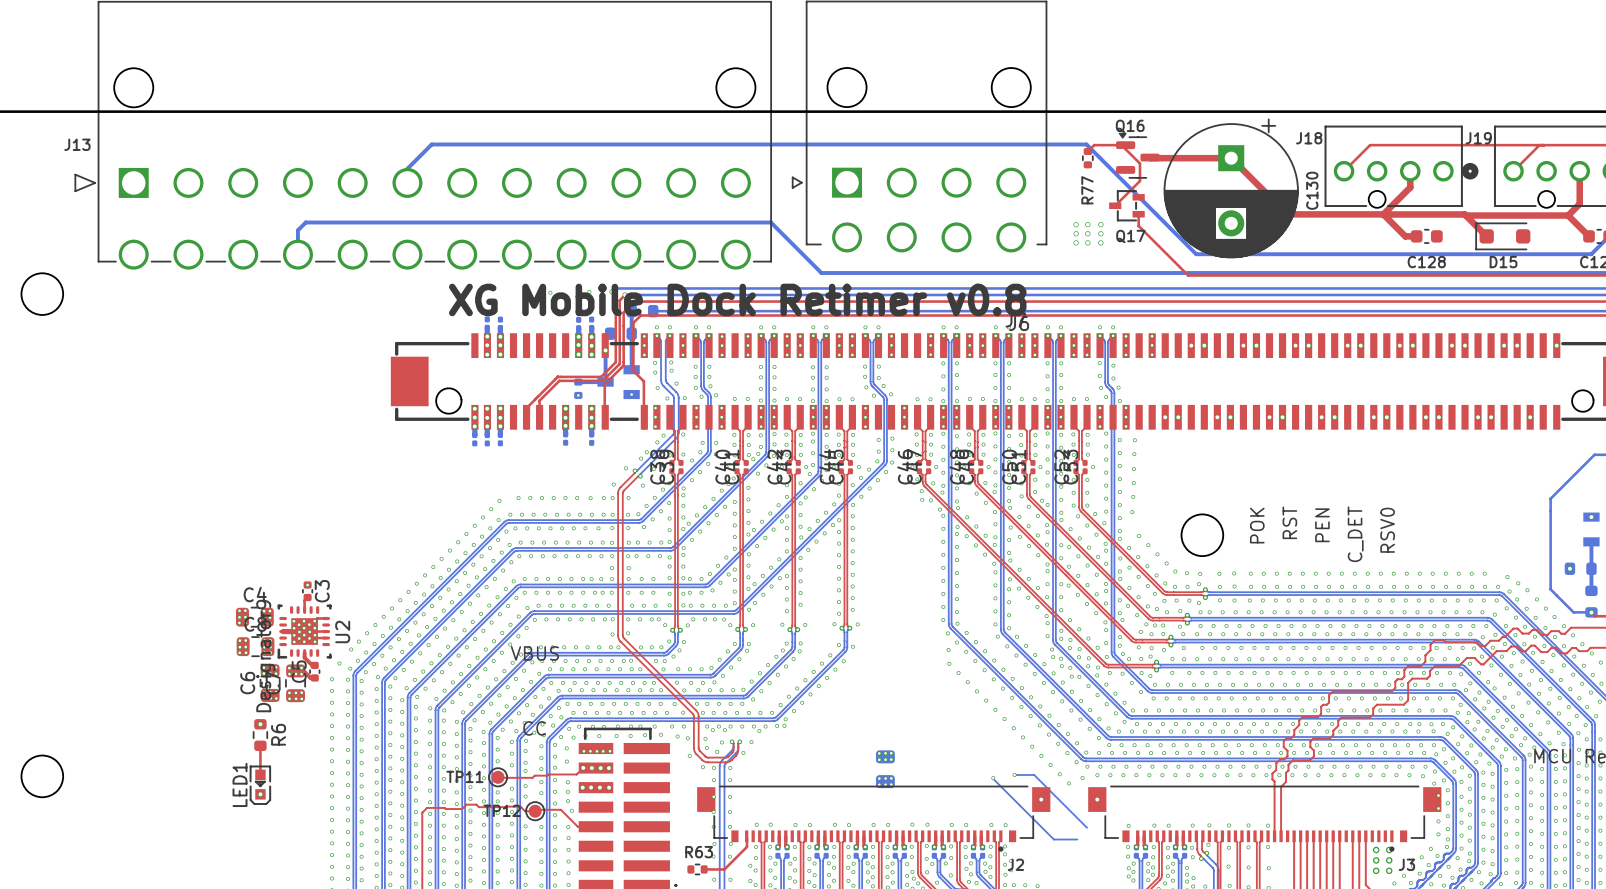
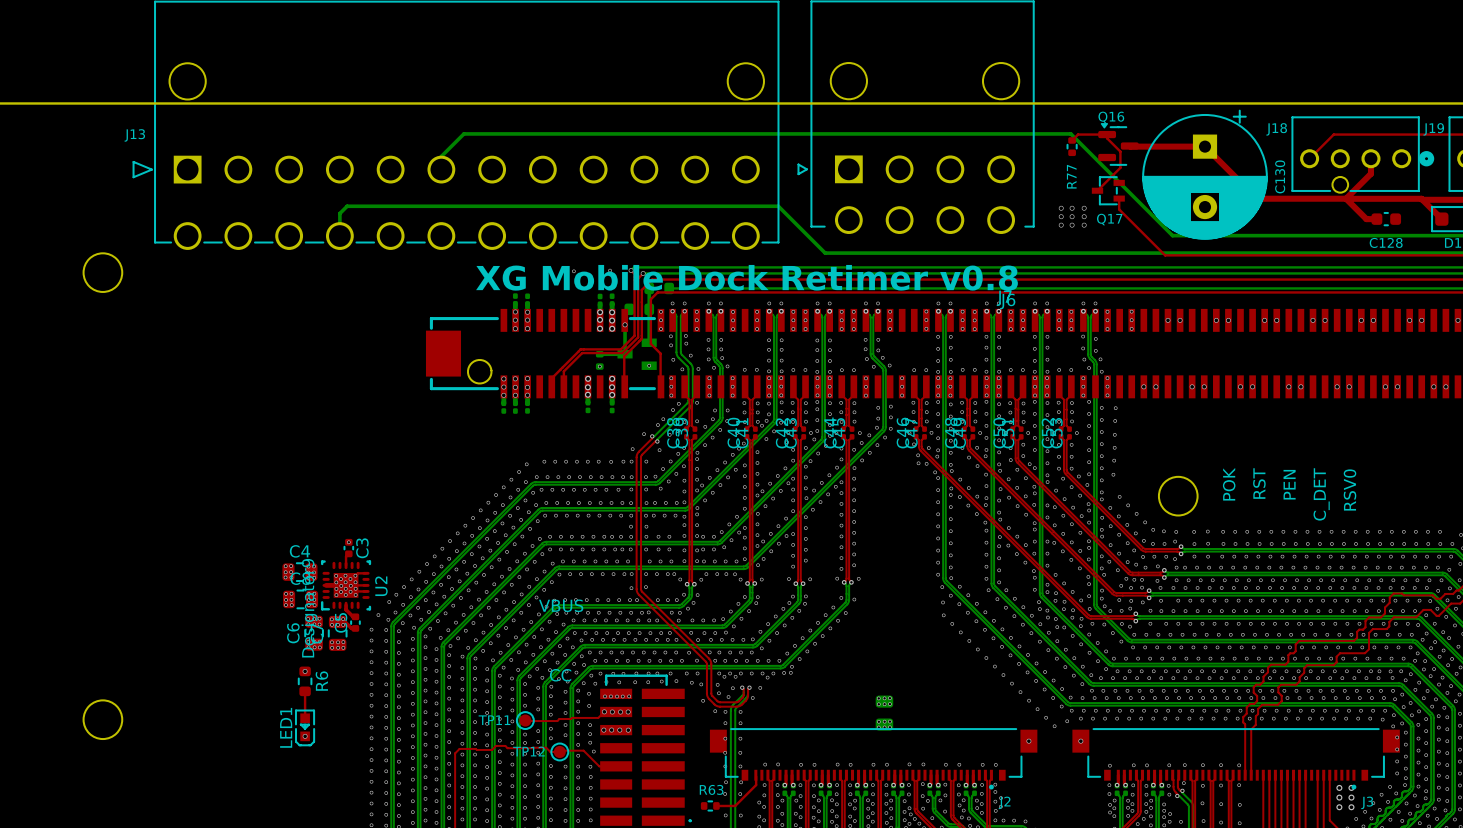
bottom track: (1014, 774) (1034, 774) (1087, 827) -> none
via: (1014, 774) -> none
bottom track: (993, 778) (1053, 839) (1077, 839) -> none
via: (993, 778) -> none

